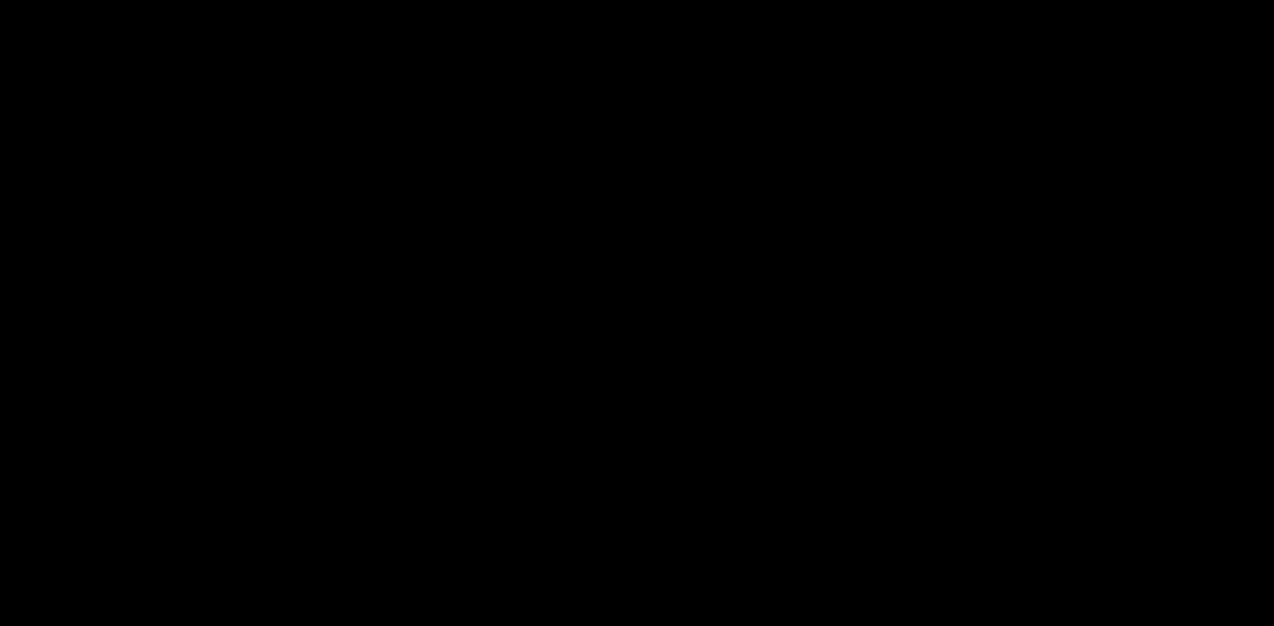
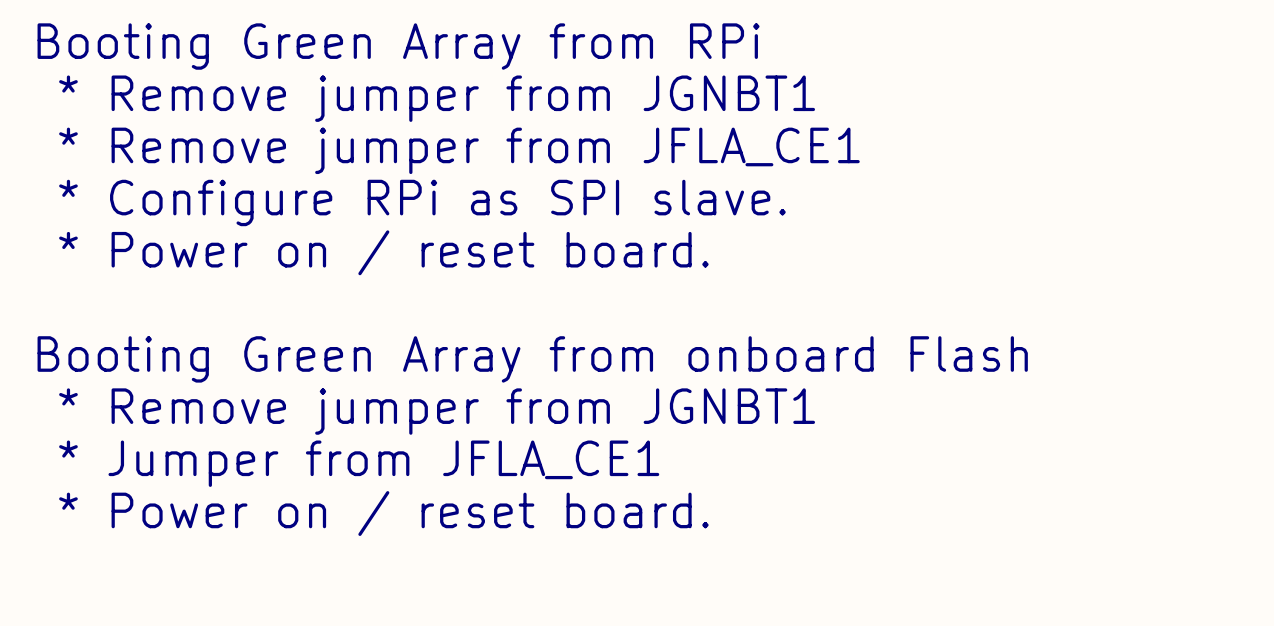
text: none -> Booting Green Array from RPi (398, 46)
text: none -> * Remove jumper from JGNBT1 (437, 98)
text: none -> * Remove jumper from JFLA_CE1 (459, 150)
text: none -> * Configure RPi as SPI slave. (422, 202)
text: none -> * Power on / reset board. (383, 252)
text: none -> Booting Green Array from onboard Flash (532, 359)
text: none -> * Remove jumper from JGNBT1 (437, 411)
text: none -> * Jumper from JFLA_CE1 (359, 463)
text: none -> * Power on / reset board. (383, 513)

